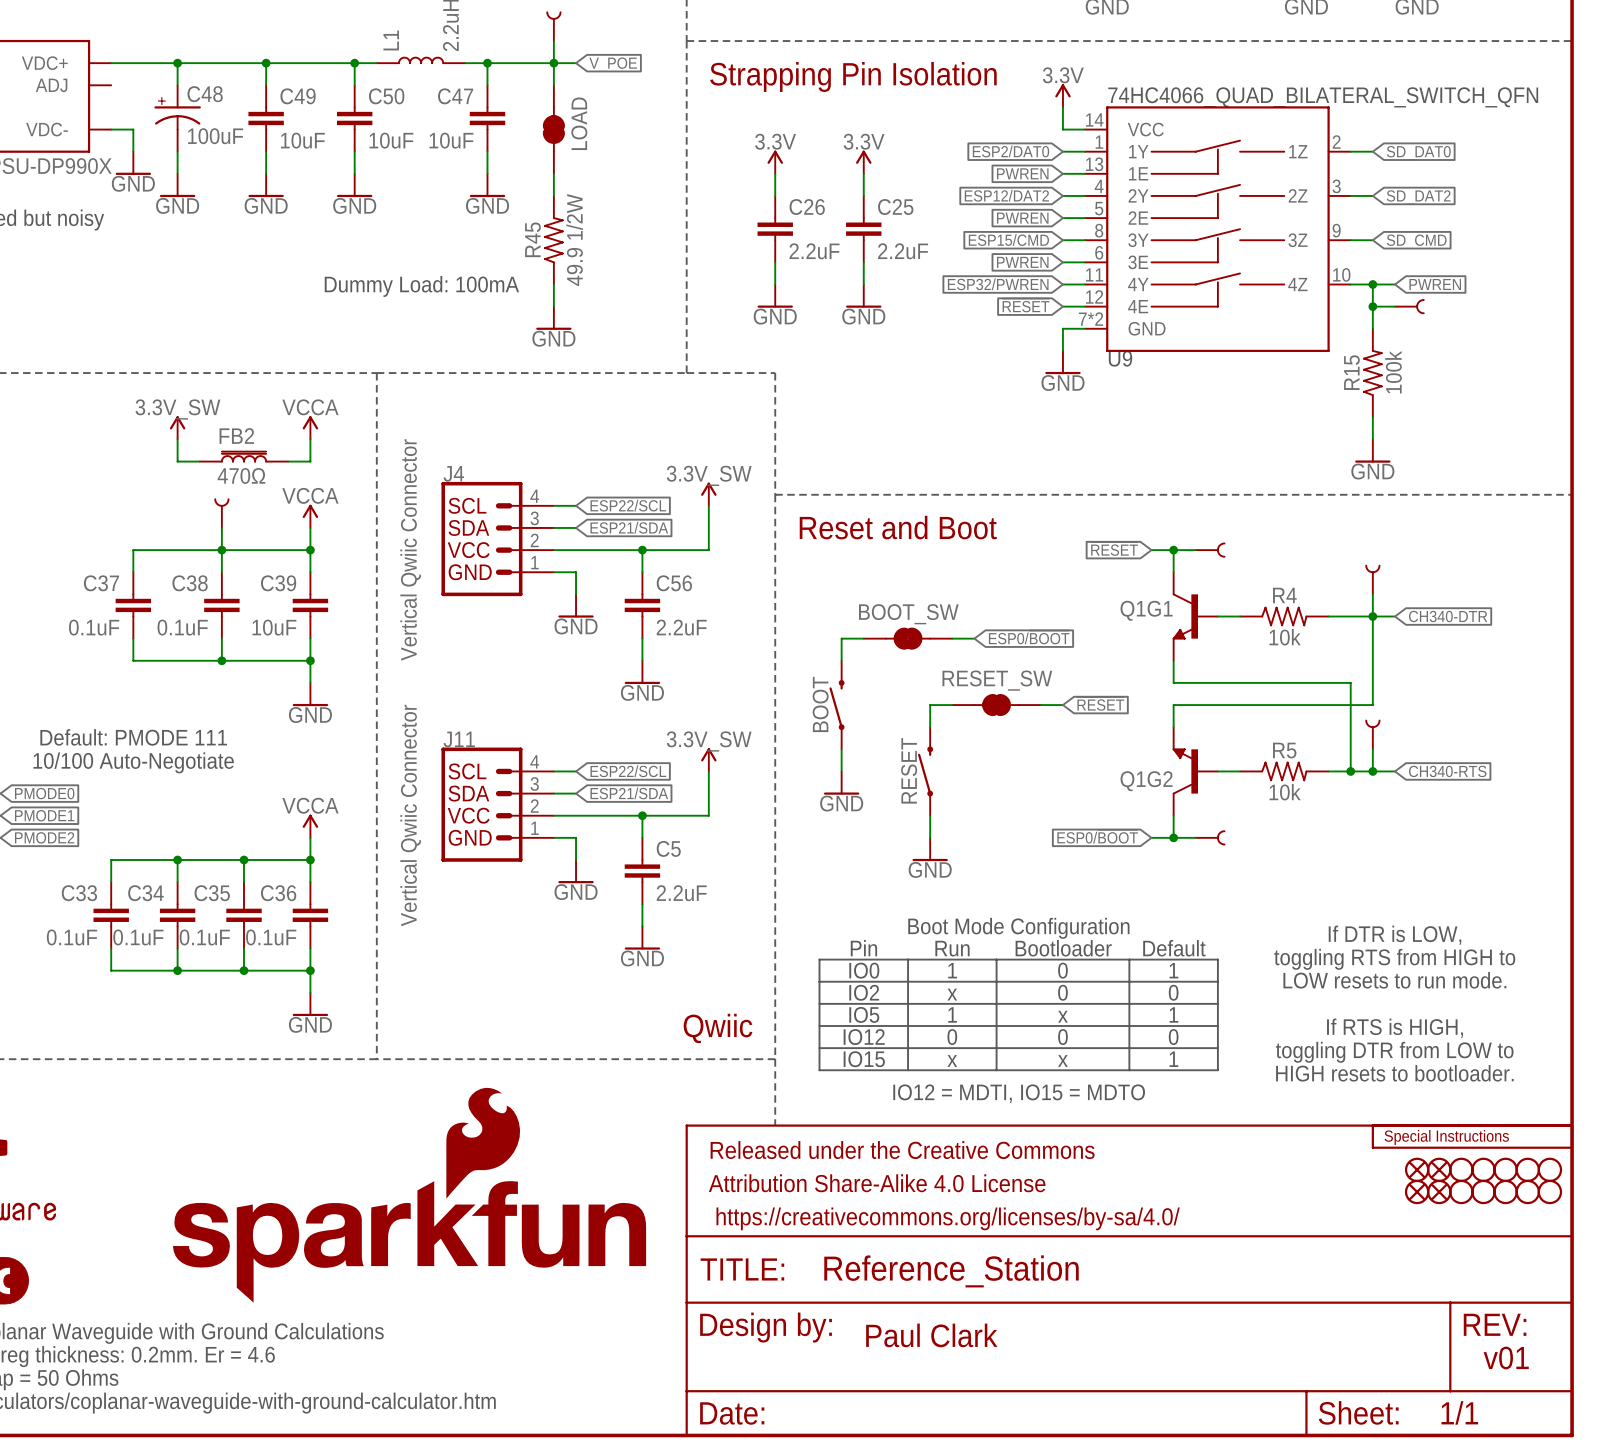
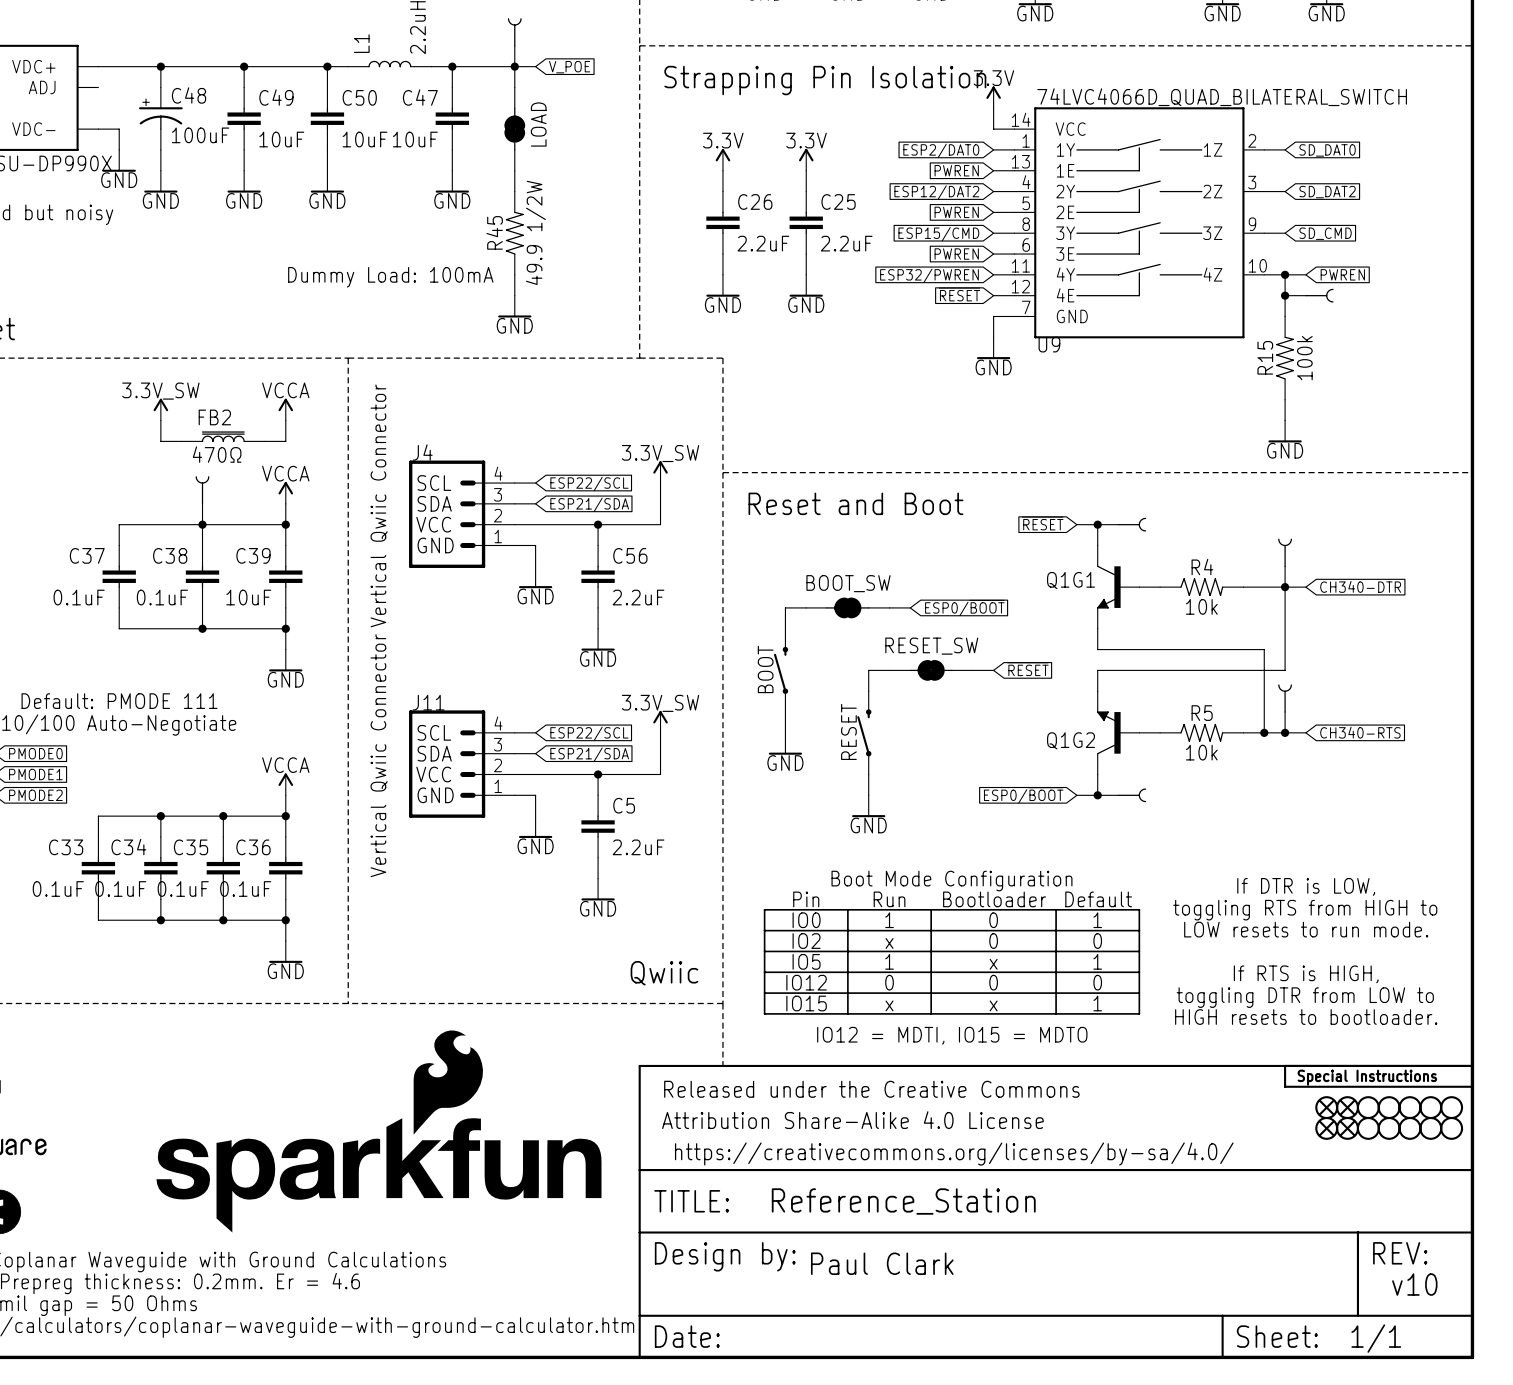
U9 value: 74HC4066_QUAD_BILATERAL_SWITCH_QFN (1323, 97) -> 74LVC4066D_QUAD_BILATERAL_SWITCH (1222, 97)
U9 pin number: 7*2 (1090, 319) -> 7 (1026, 307)
text: v01 (1506, 1358) -> v10 (1414, 1284)

